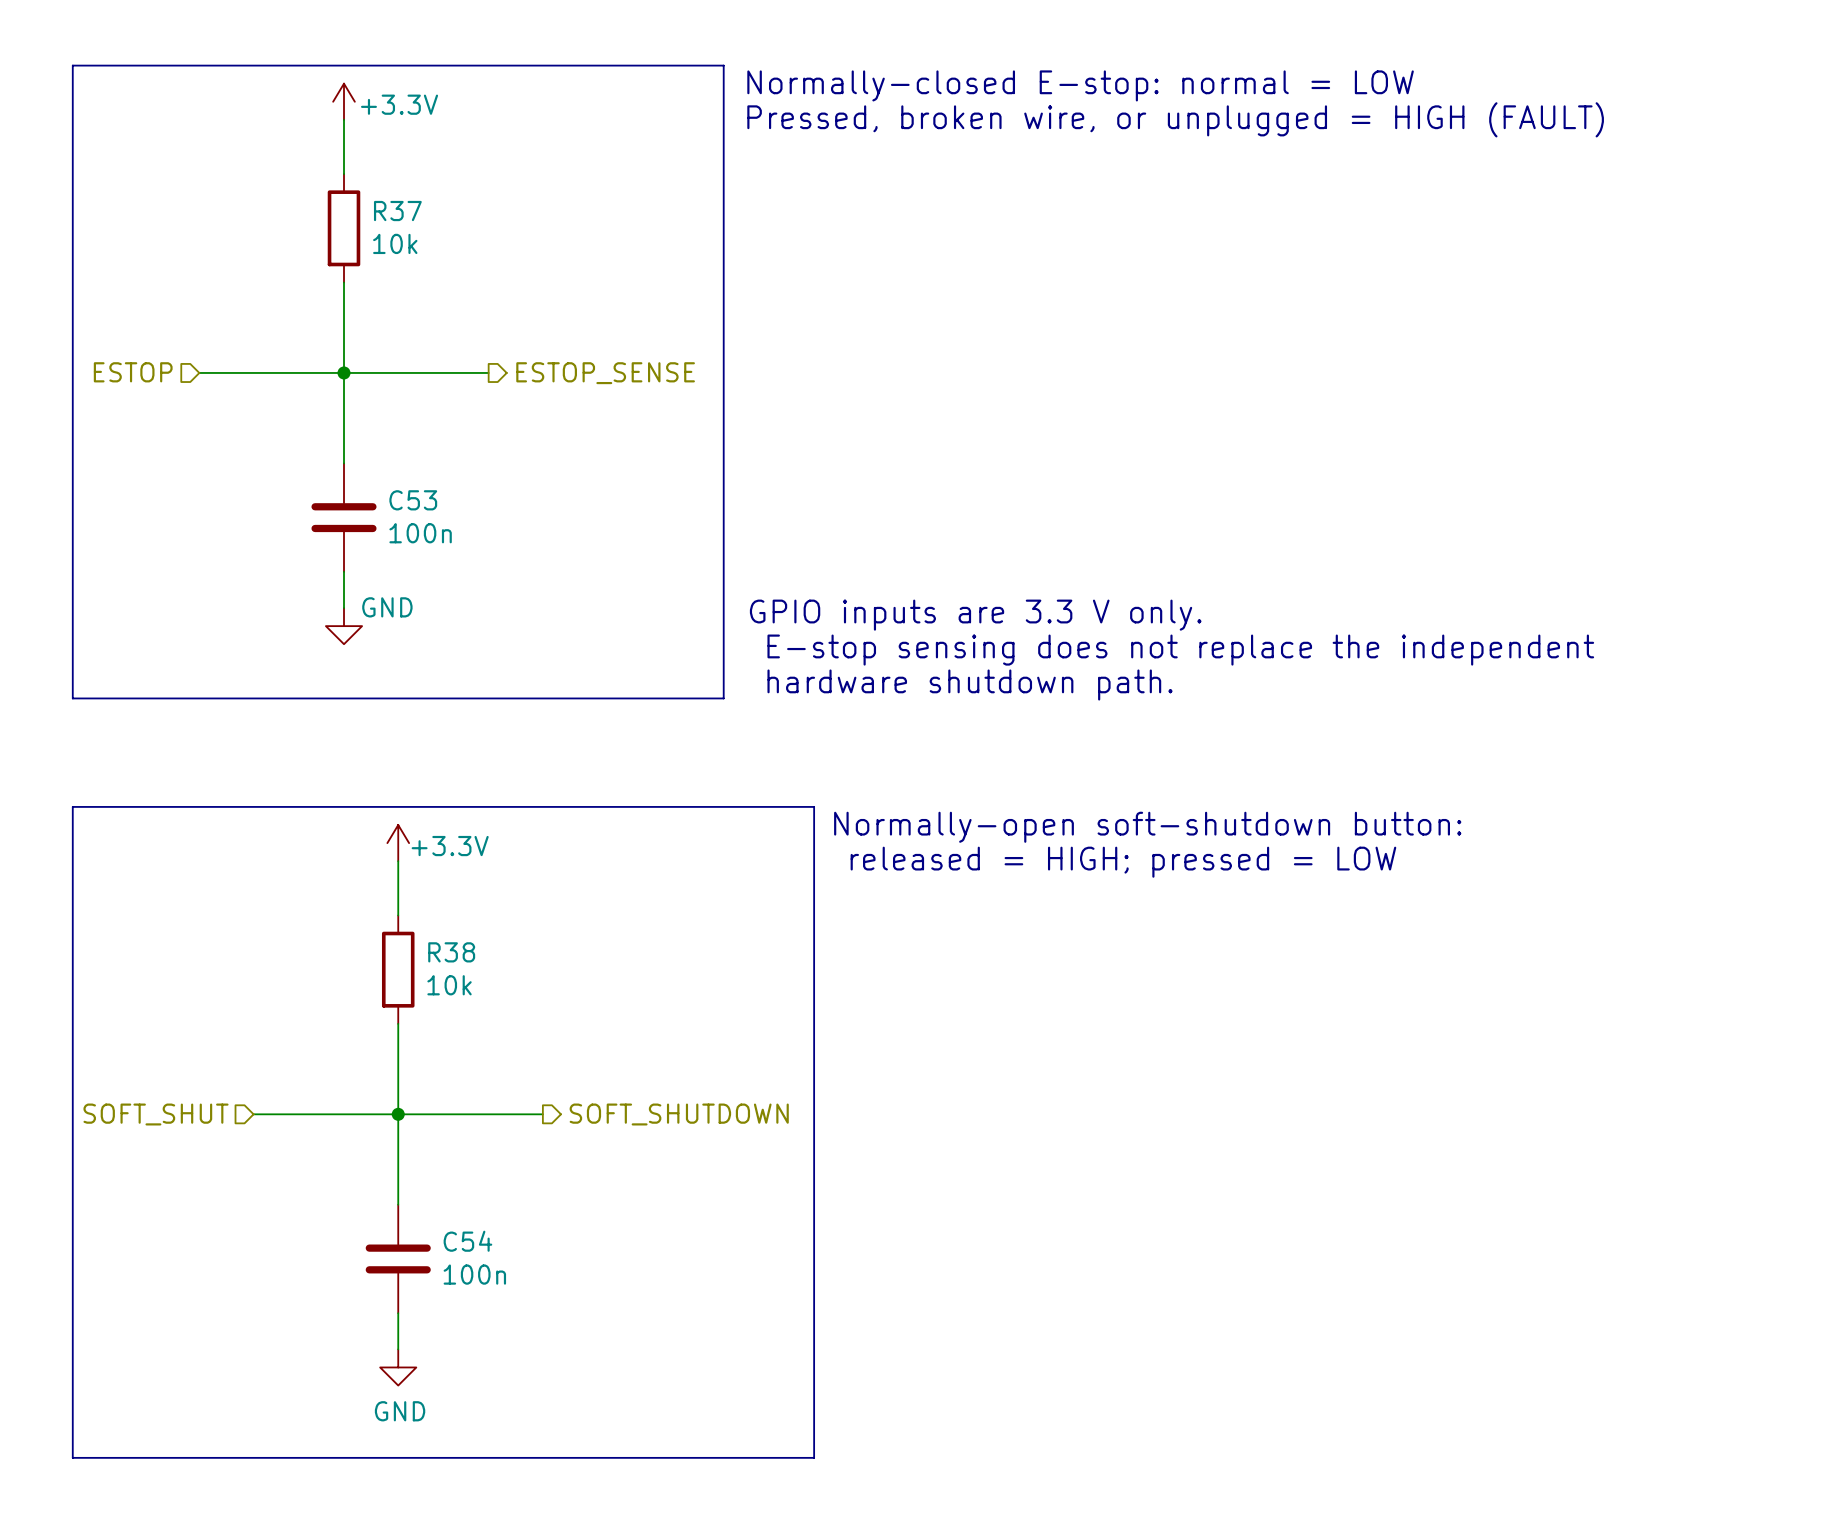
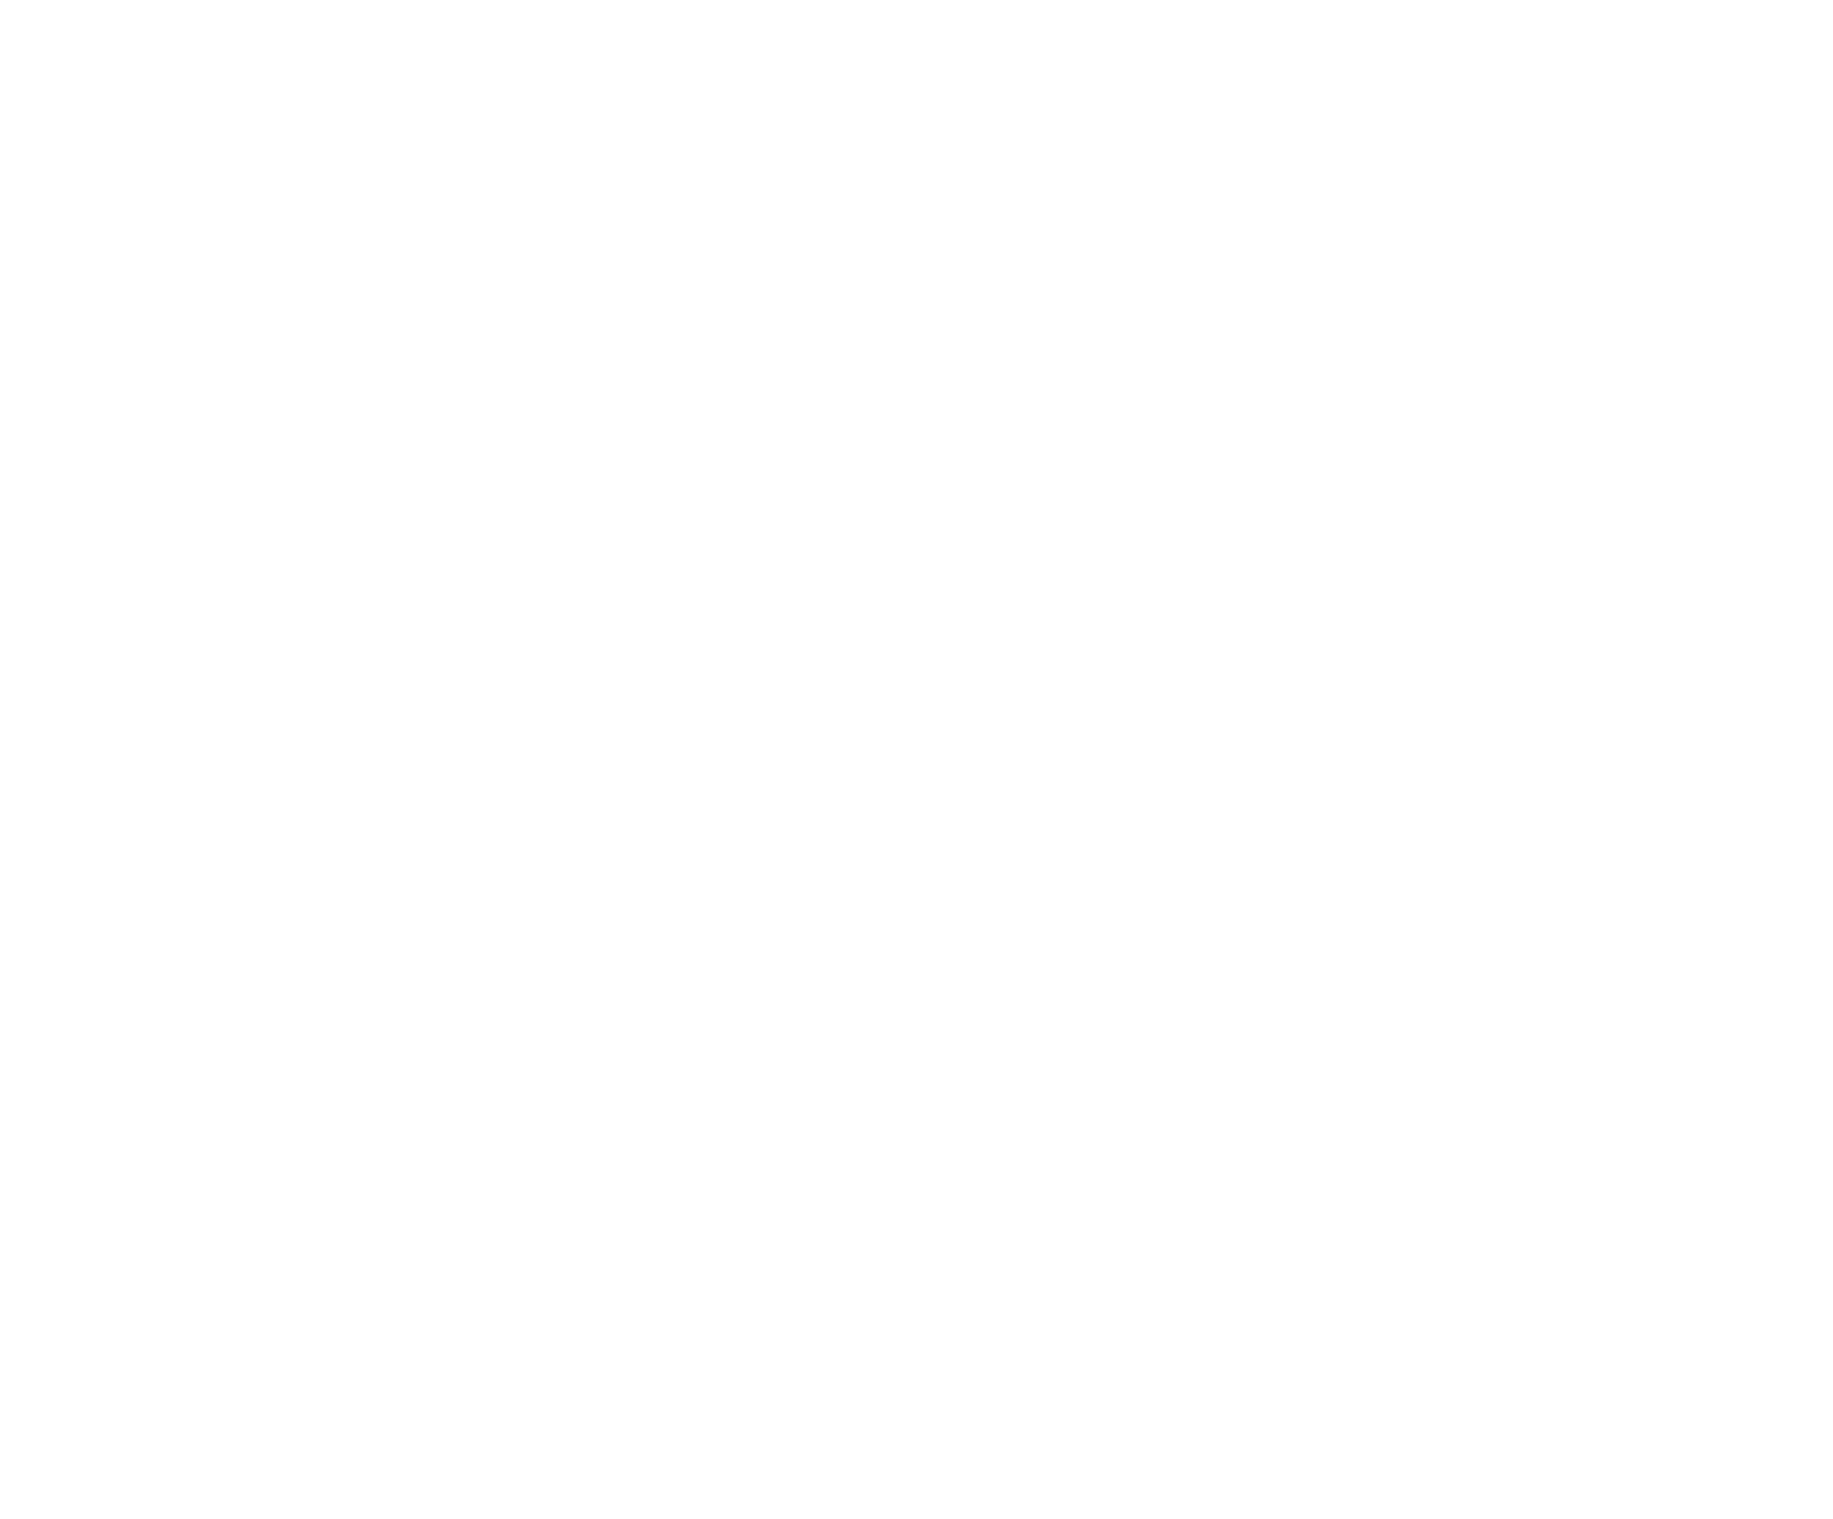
line: (72, 65) (723, 65) (723, 698) (72, 698) (72, 65) -> none
text: Normally-closed E-stop: normal = LOW (1080, 85) -> none
power symbol: +3.3V (344, 101) -> none
wire: (344, 119) (344, 174) -> none
text: Pressed, broken wire, or unplugged = HIGH (FAULT) (1175, 119) -> none
R37: 10k (344, 228) -> none
wire: (344, 282) (344, 463) -> none
hierarchical label: ESTOP (133, 372) -> none
wire: (199, 372) (488, 372) -> none
junction: (344, 372) -> none
hierarchical label: ESTOP_SENSE (605, 373) -> none
C53: 100n (344, 517) -> none
wire: (344, 571) (344, 608) -> none
text: GPIO inputs are 3.3 V only. (975, 615) -> none
power symbol: GND (344, 626) -> none
text: E-stop sensing does not replace the independent (1180, 650) -> none
text: hardware shutdown path. (970, 685) -> none
line: (72, 806) (72, 1457) (814, 1457) (814, 806) (72, 806) -> none
text: Normally-open soft-shutdown button: (1147, 827) -> none
power symbol: +3.3V (398, 843) -> none
wire: (398, 861) (398, 915) -> none
text: released = HIGH; pressed = LOW (1123, 862) -> none
R38: 10k (398, 969) -> none
wire: (398, 1023) (398, 1204) -> none
hierarchical label: SOFT_SHUT (156, 1114) -> none
wire: (253, 1114) (542, 1114) -> none
junction: (398, 1114) -> none
hierarchical label: SOFT_SHUTDOWN (679, 1114) -> none
C54: 100n (398, 1258) -> none
wire: (398, 1313) (398, 1349) -> none
power symbol: GND (398, 1367) -> none

